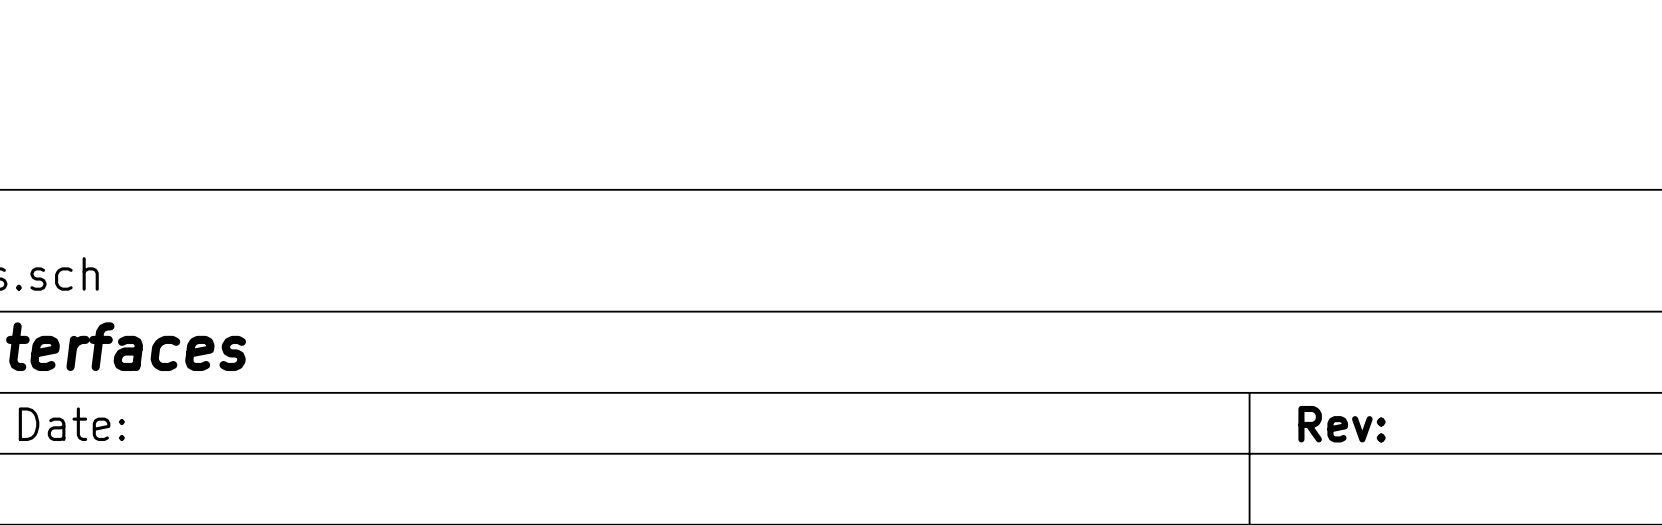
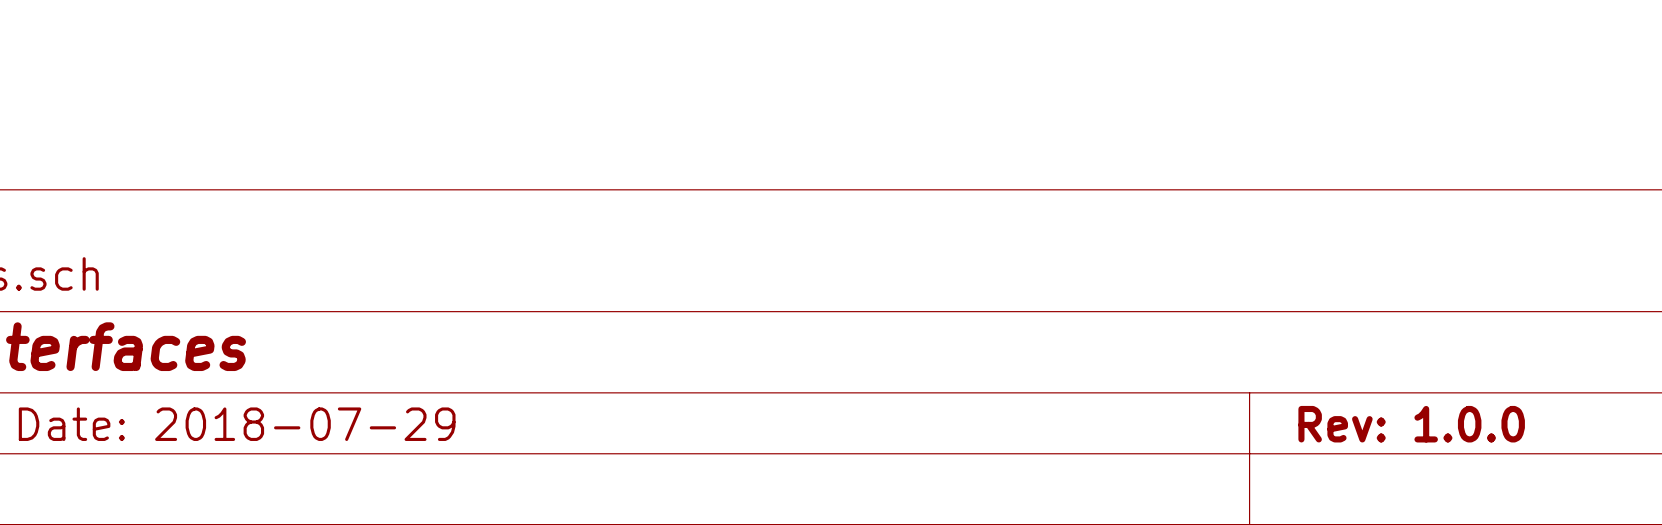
title block: Date: (71, 424) -> Date: 2018-07-29 (237, 424)
title block: Rev: (1342, 424) -> Rev: 1.0.0 (1411, 424)

